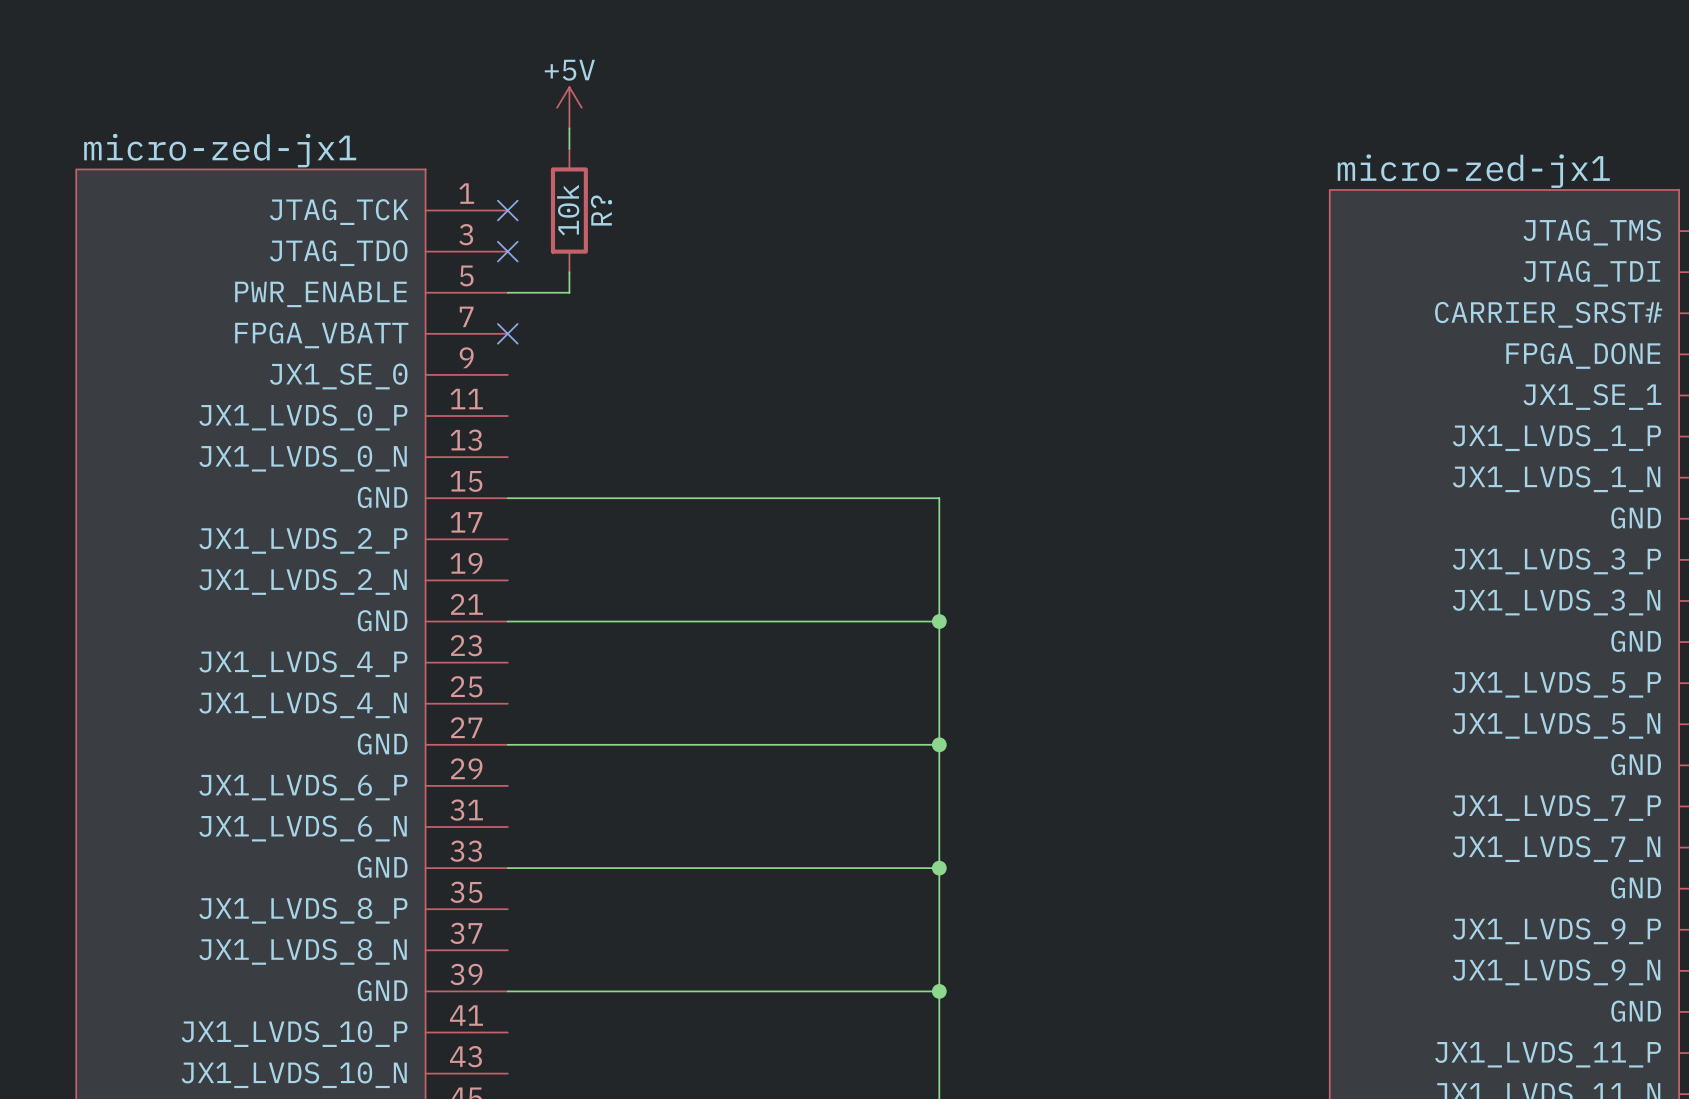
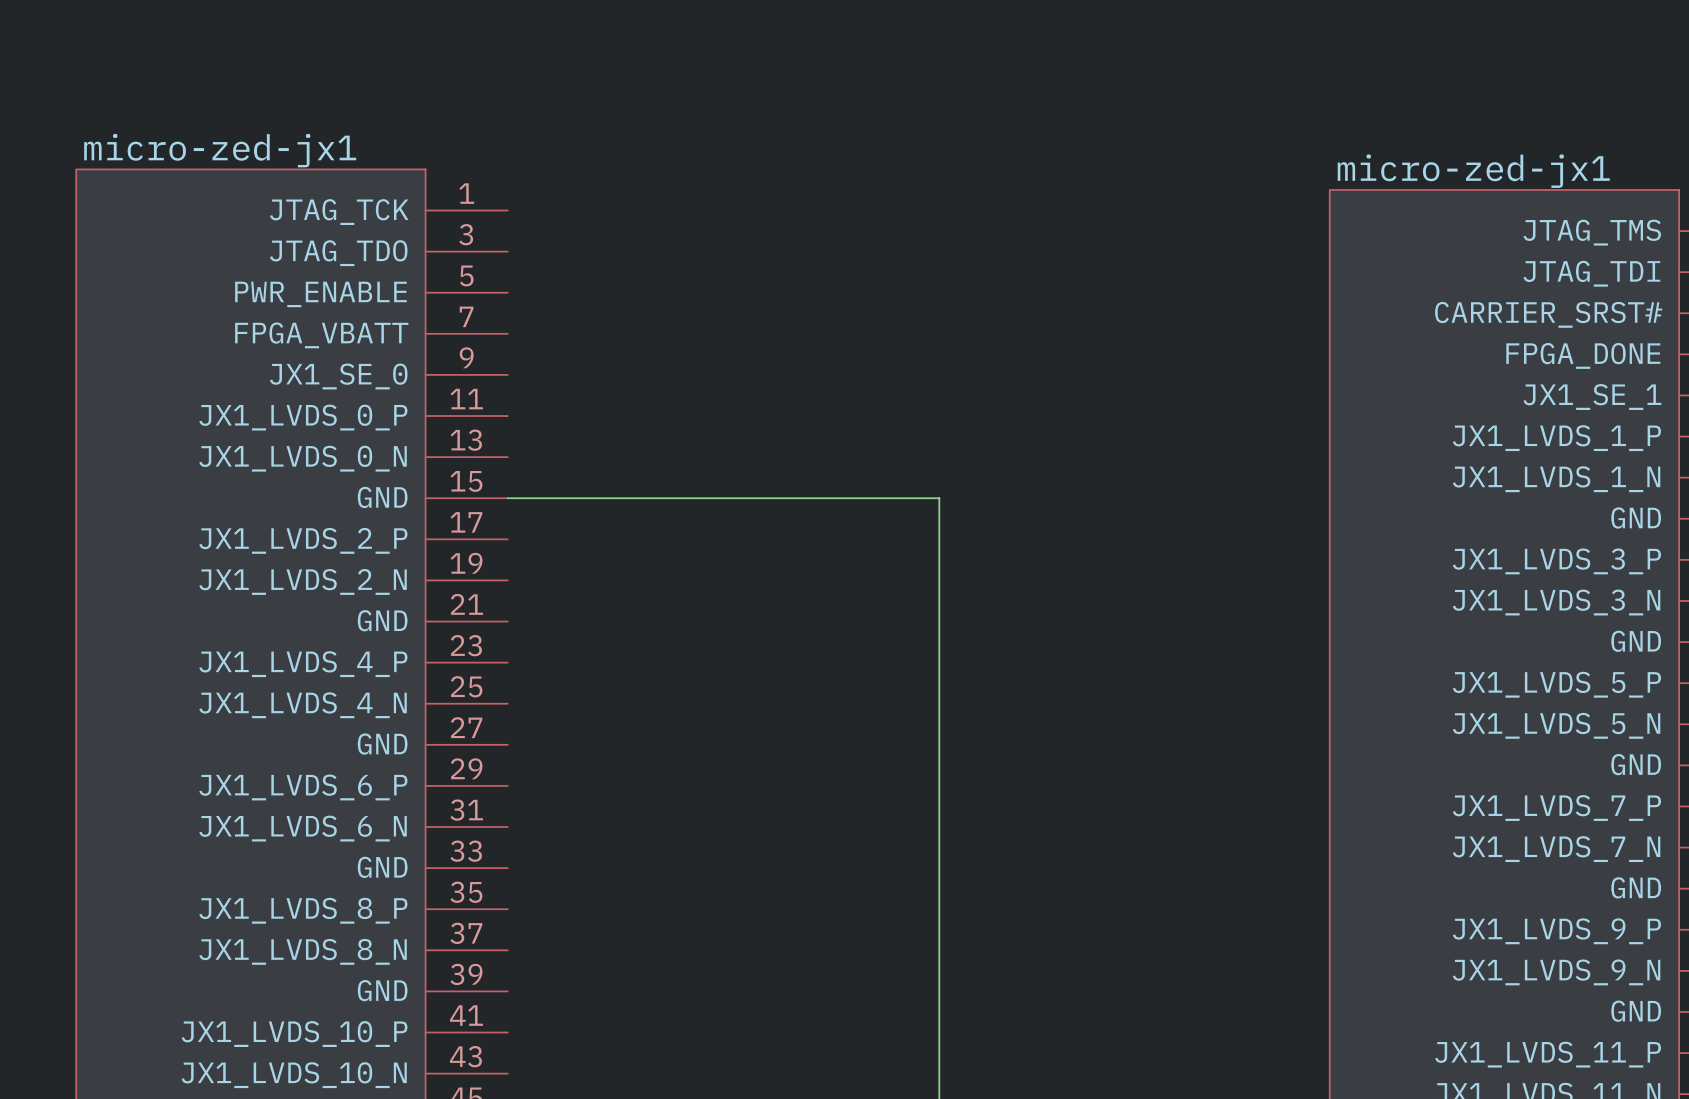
power symbol: +5V (569, 107) -> none
wire: (569, 128) (569, 148) -> none
no-connect mark: (507, 210) -> none
R?: 10k (569, 210) -> none
no-connect mark: (507, 251) -> none
wire: (569, 272) (569, 292) (507, 292) -> none
no-connect mark: (507, 333) -> none
wire: (507, 621) (939, 621) -> none
junction: (939, 621) -> none
wire: (507, 744) (939, 744) -> none
junction: (939, 744) -> none
wire: (507, 868) (939, 868) -> none
junction: (939, 868) -> none
wire: (507, 991) (939, 991) -> none
junction: (939, 991) -> none

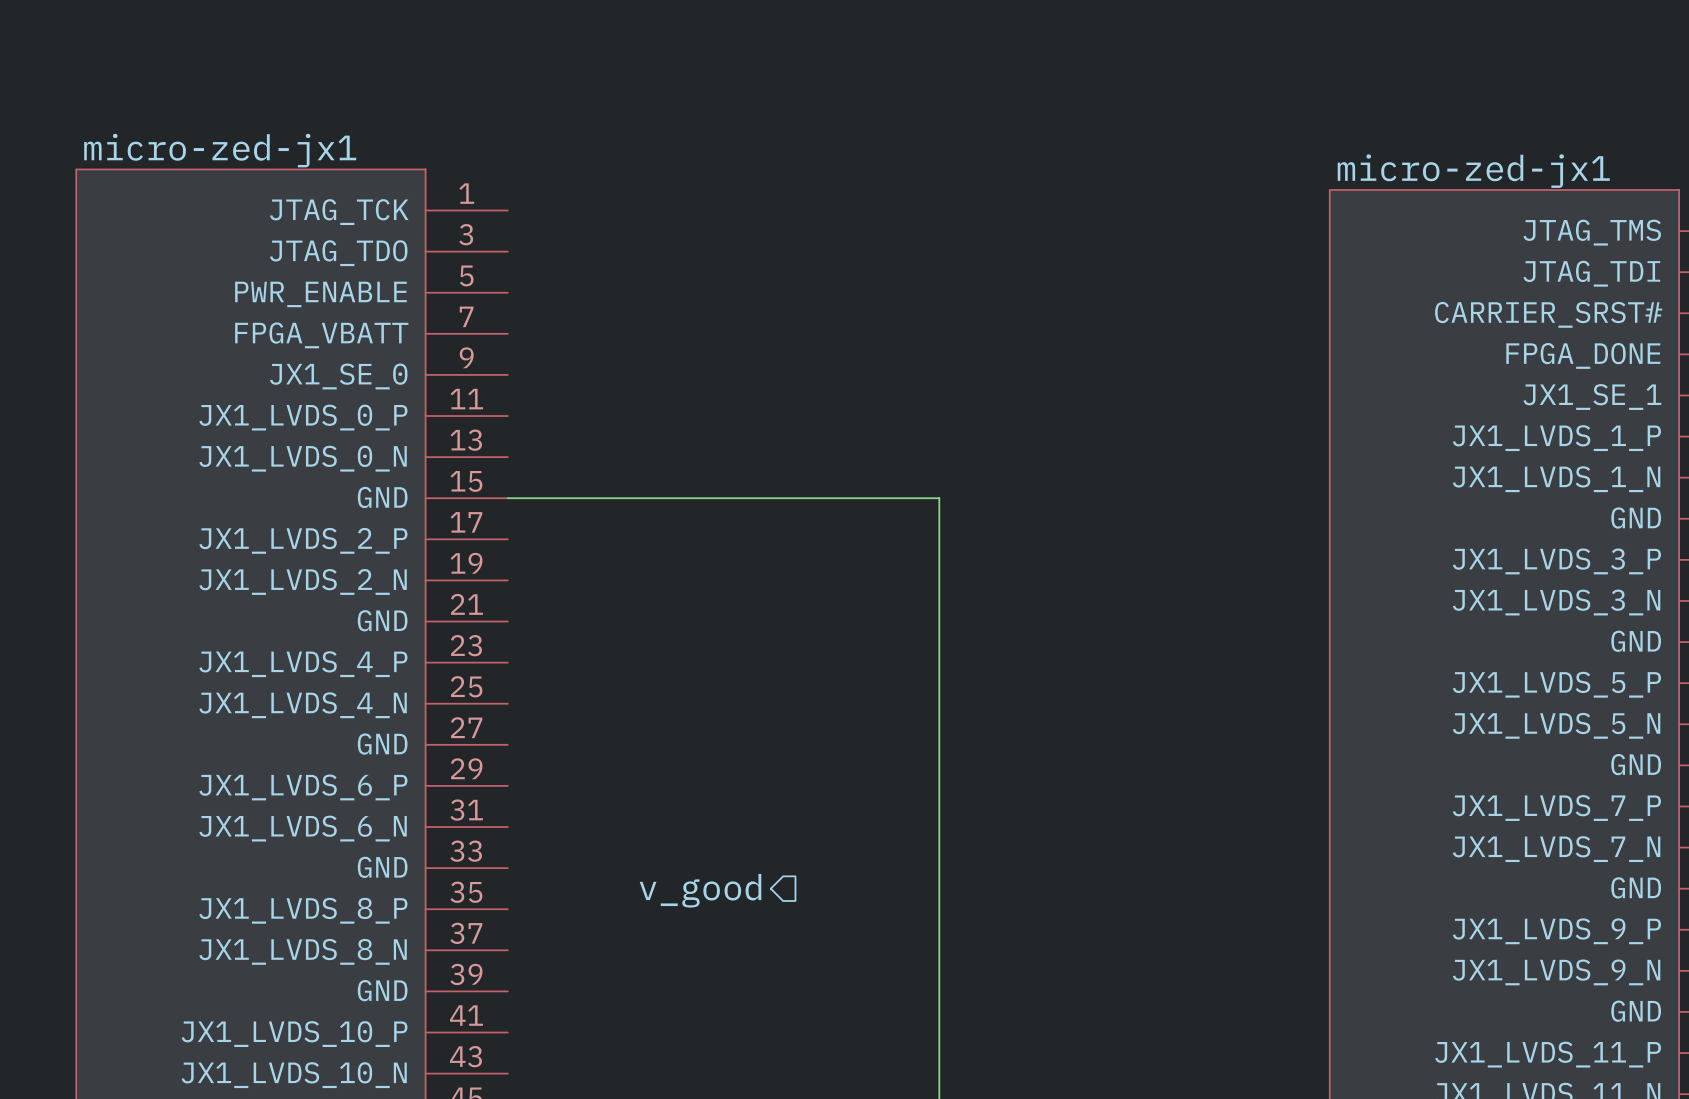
sheet pin: none -> v_good (700, 890)

